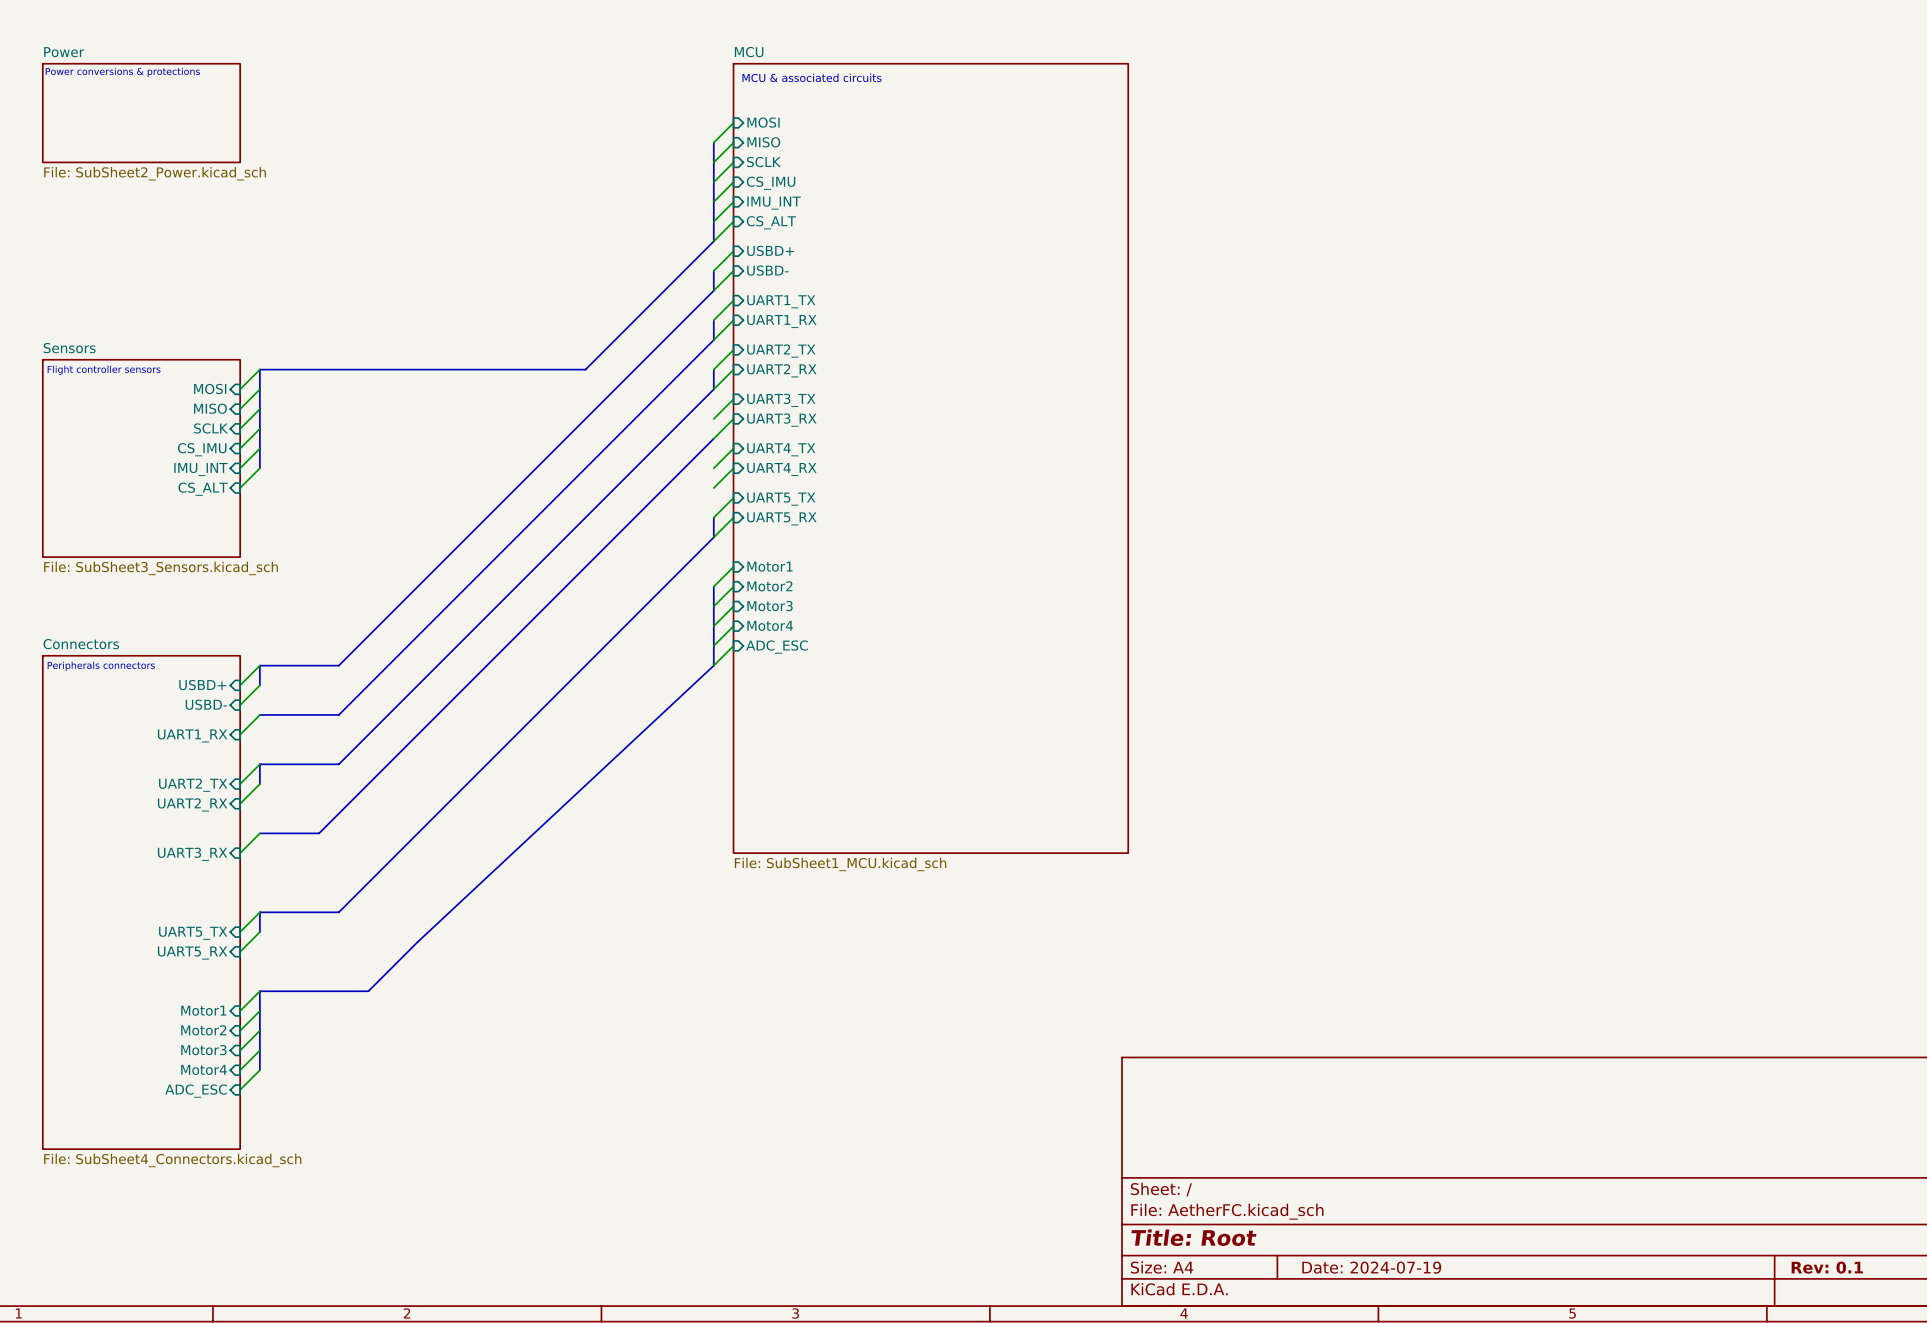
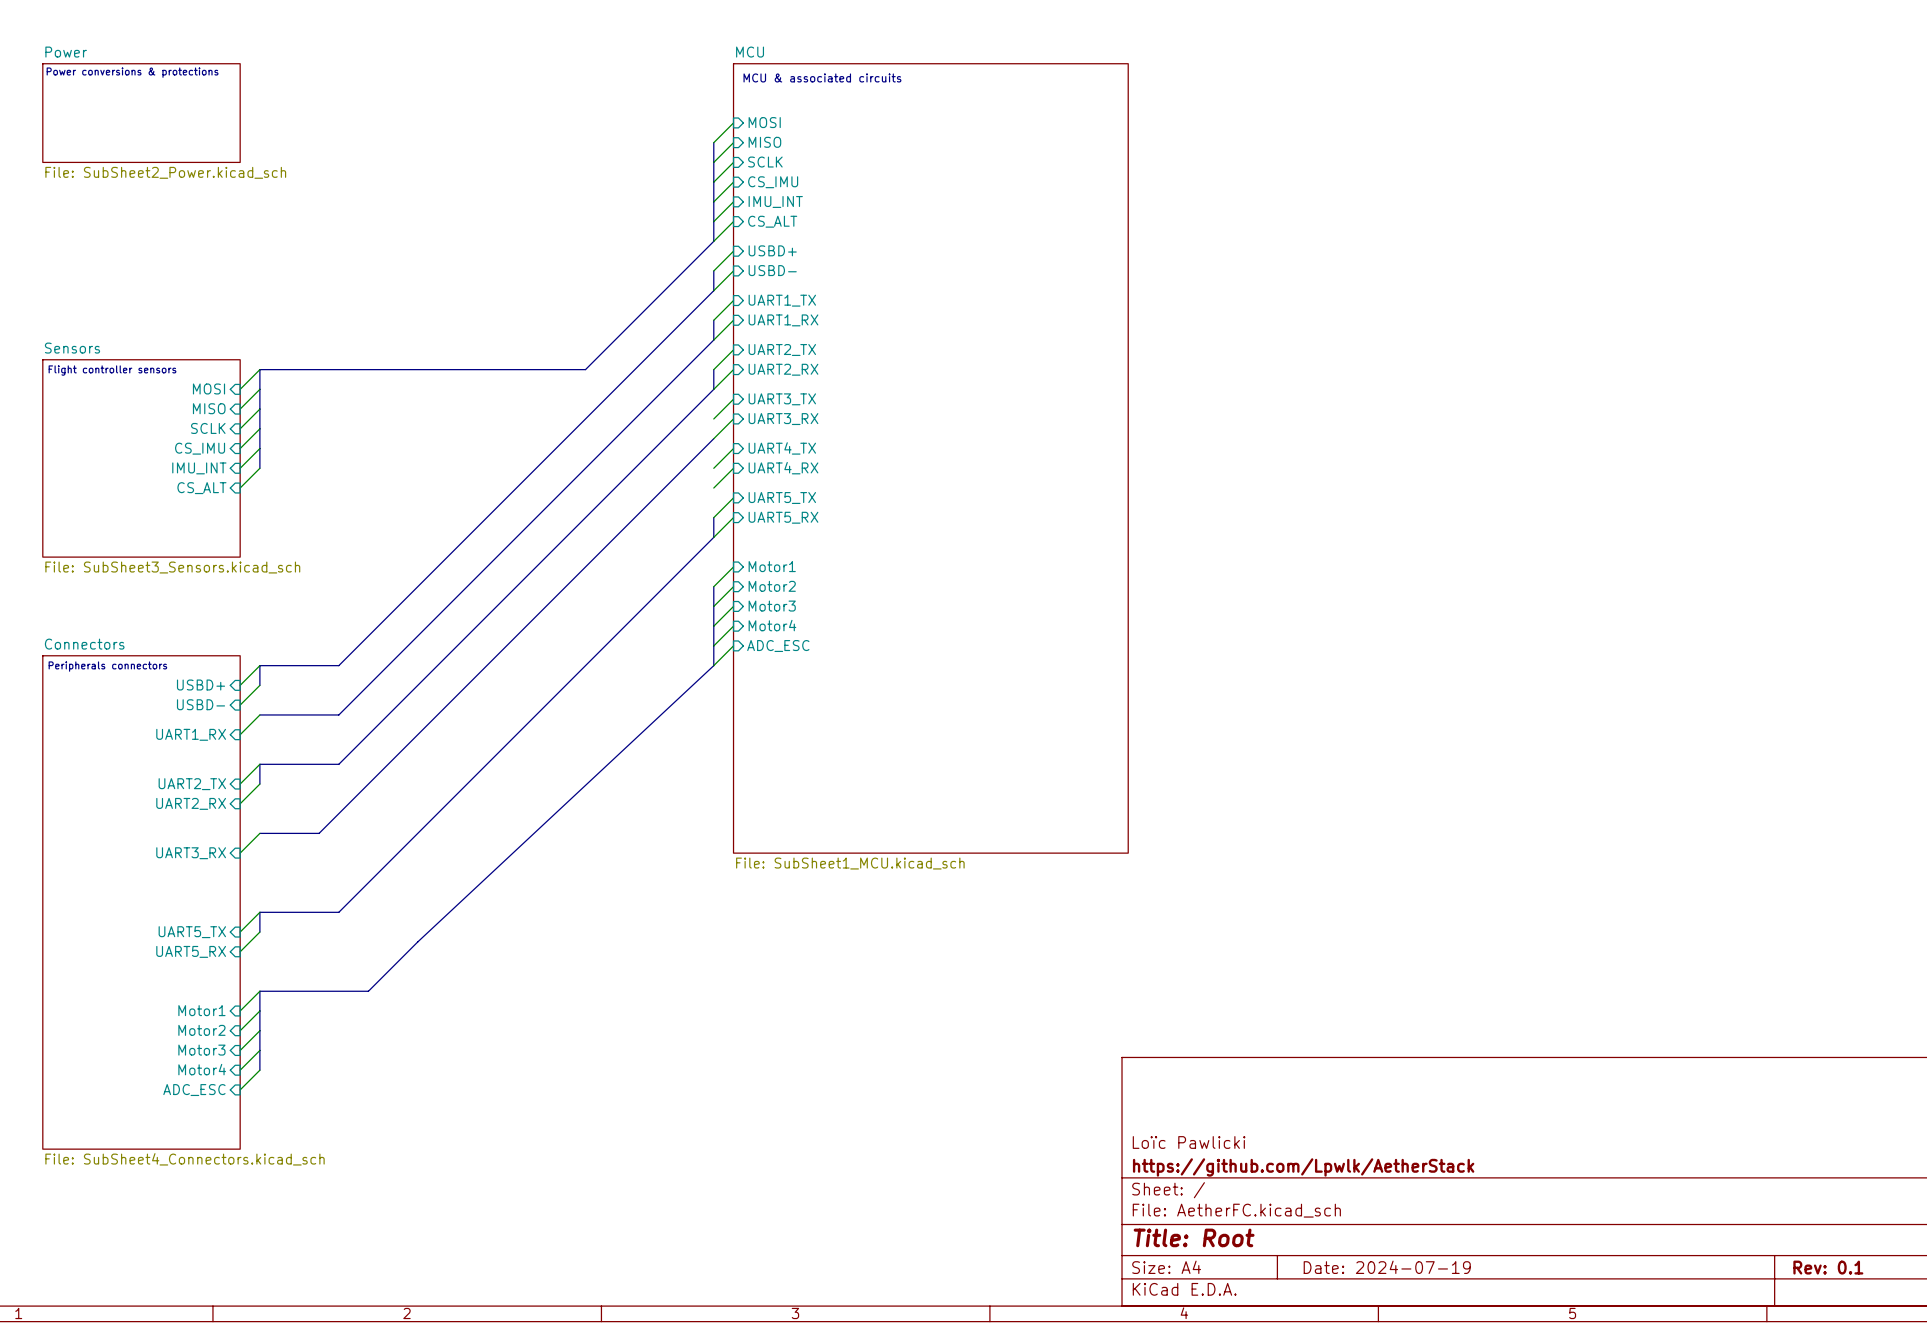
title block: none -> Loïc Pawlicki (1189, 1142)
title block: none -> https://github.com/Lpwlk/AetherStack (1303, 1167)

